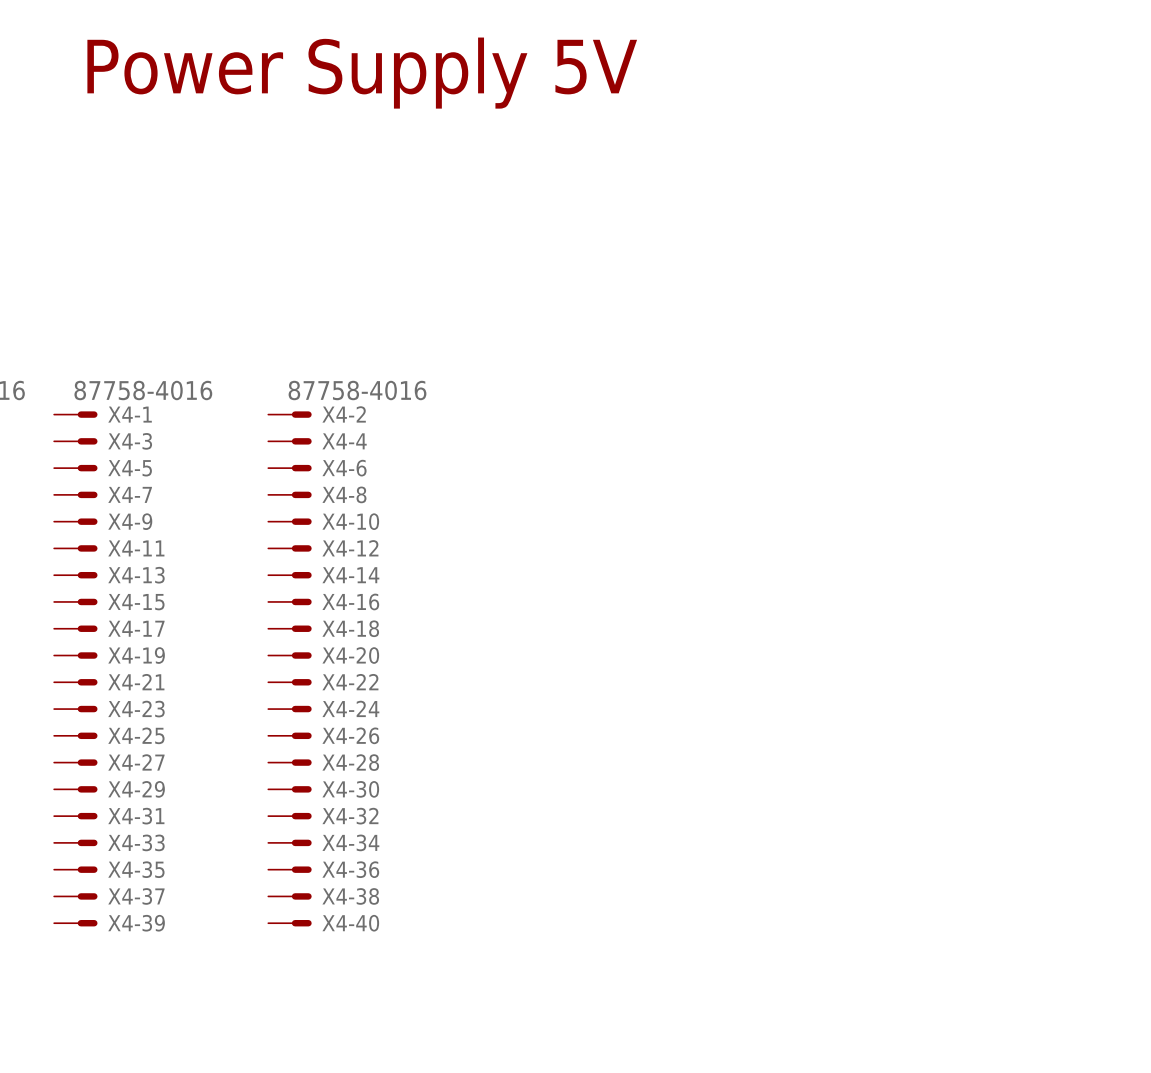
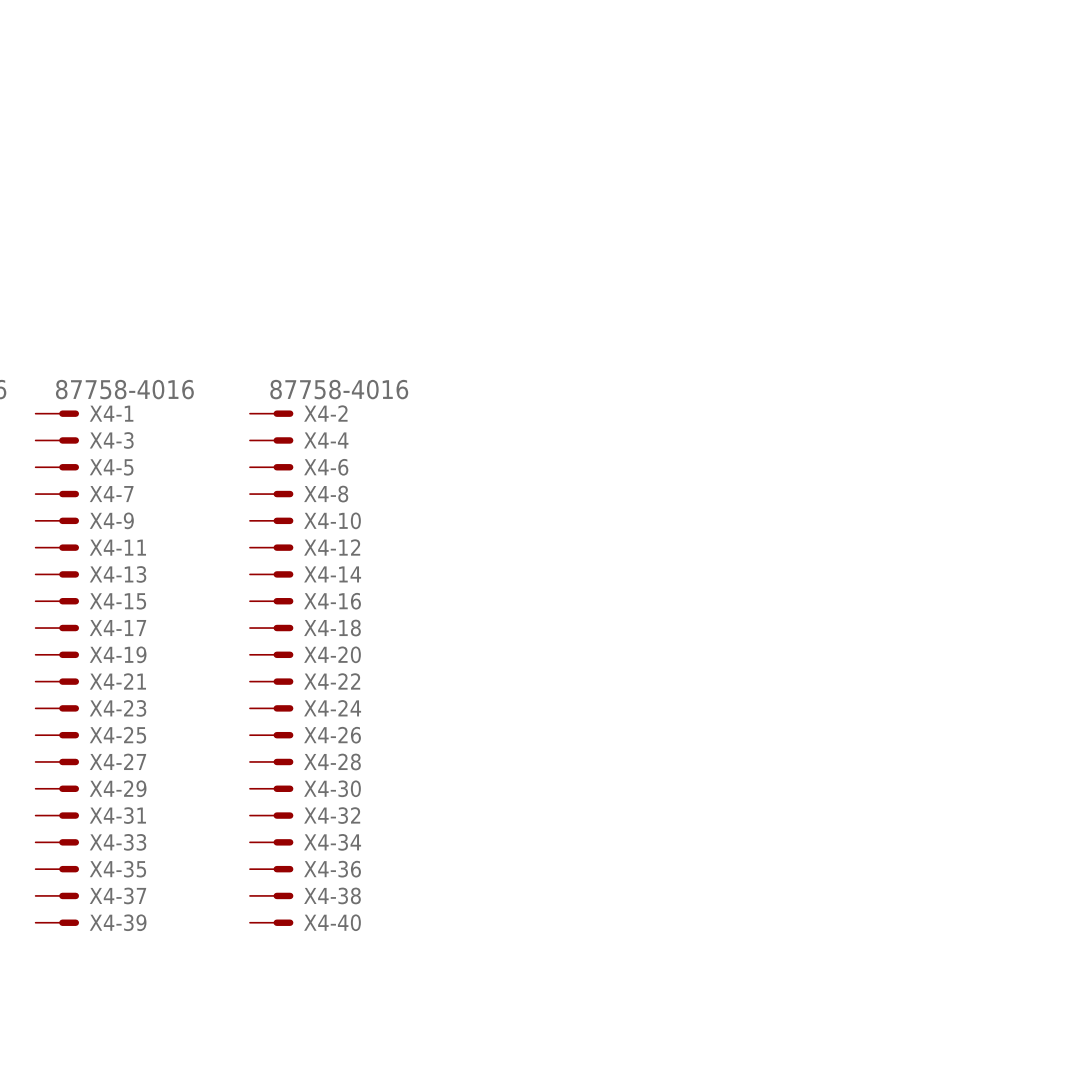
text: Power Supply 5V (362, 73) -> none

